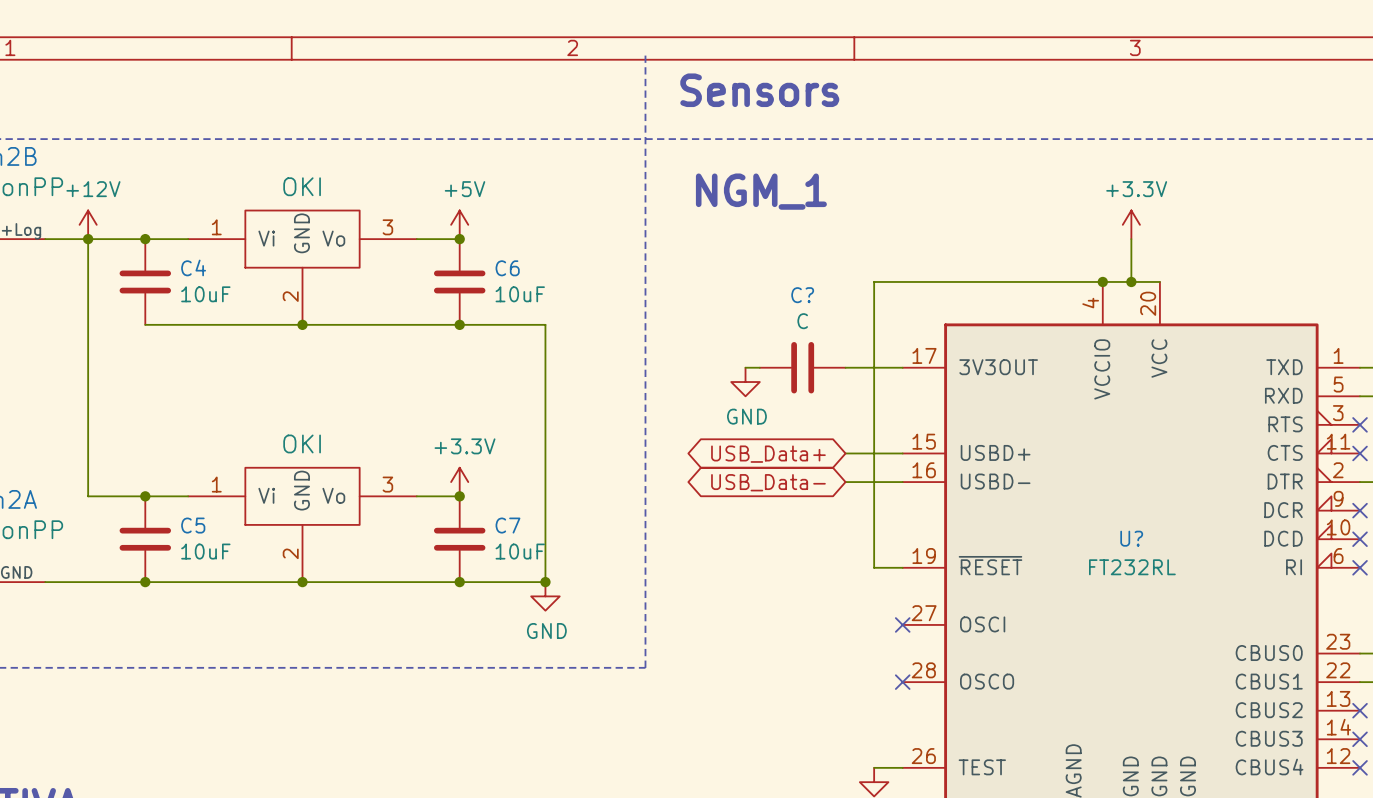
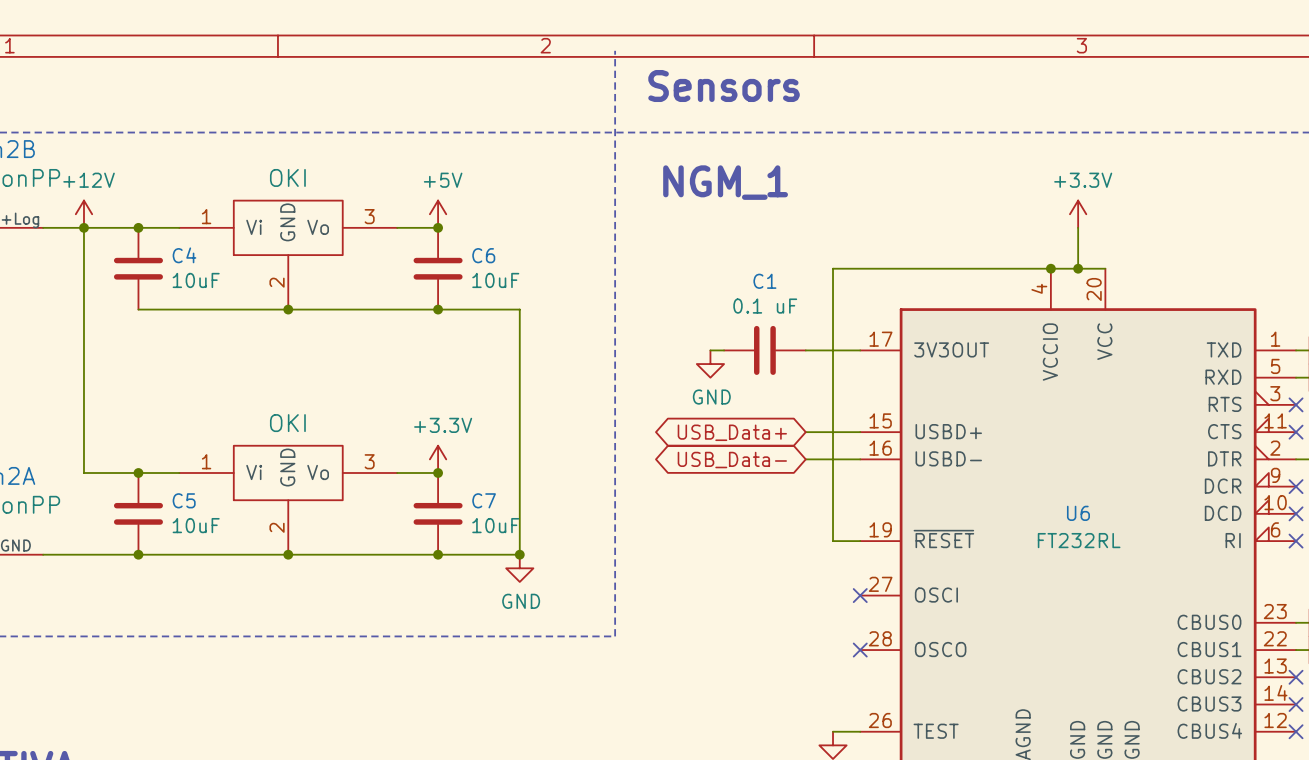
C? name: C? (802, 295) -> C1 (764, 281)
C? value: C (802, 321) -> 0.1 uF (765, 306)
U? name: U? (1131, 538) -> U6 (1078, 513)

